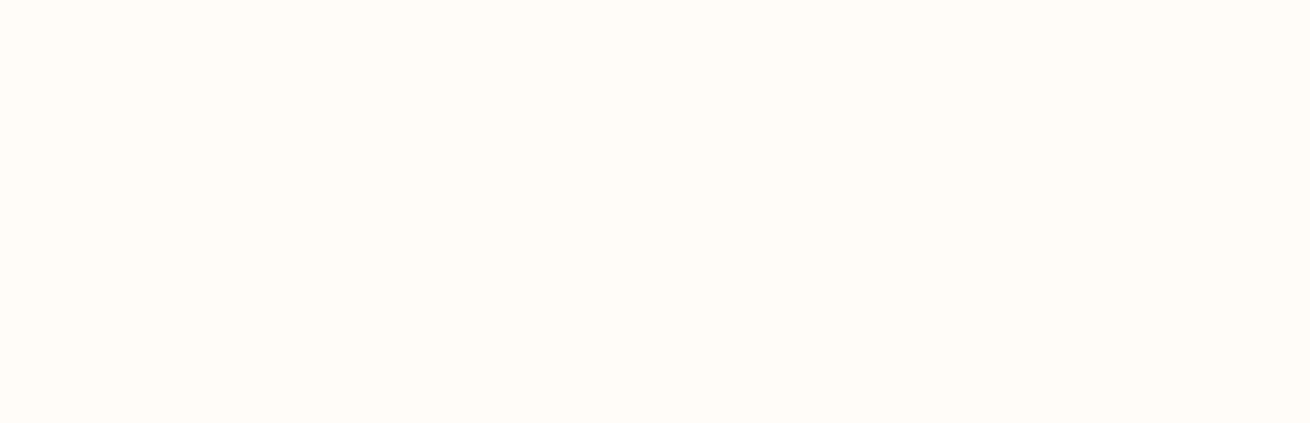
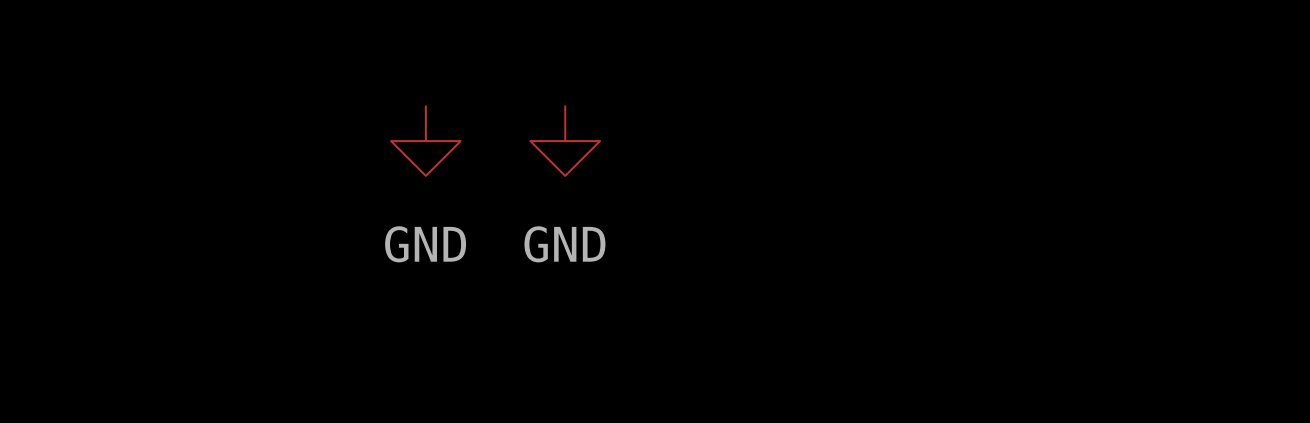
power symbol: none -> GND (425, 141)
power symbol: none -> GND (565, 141)

